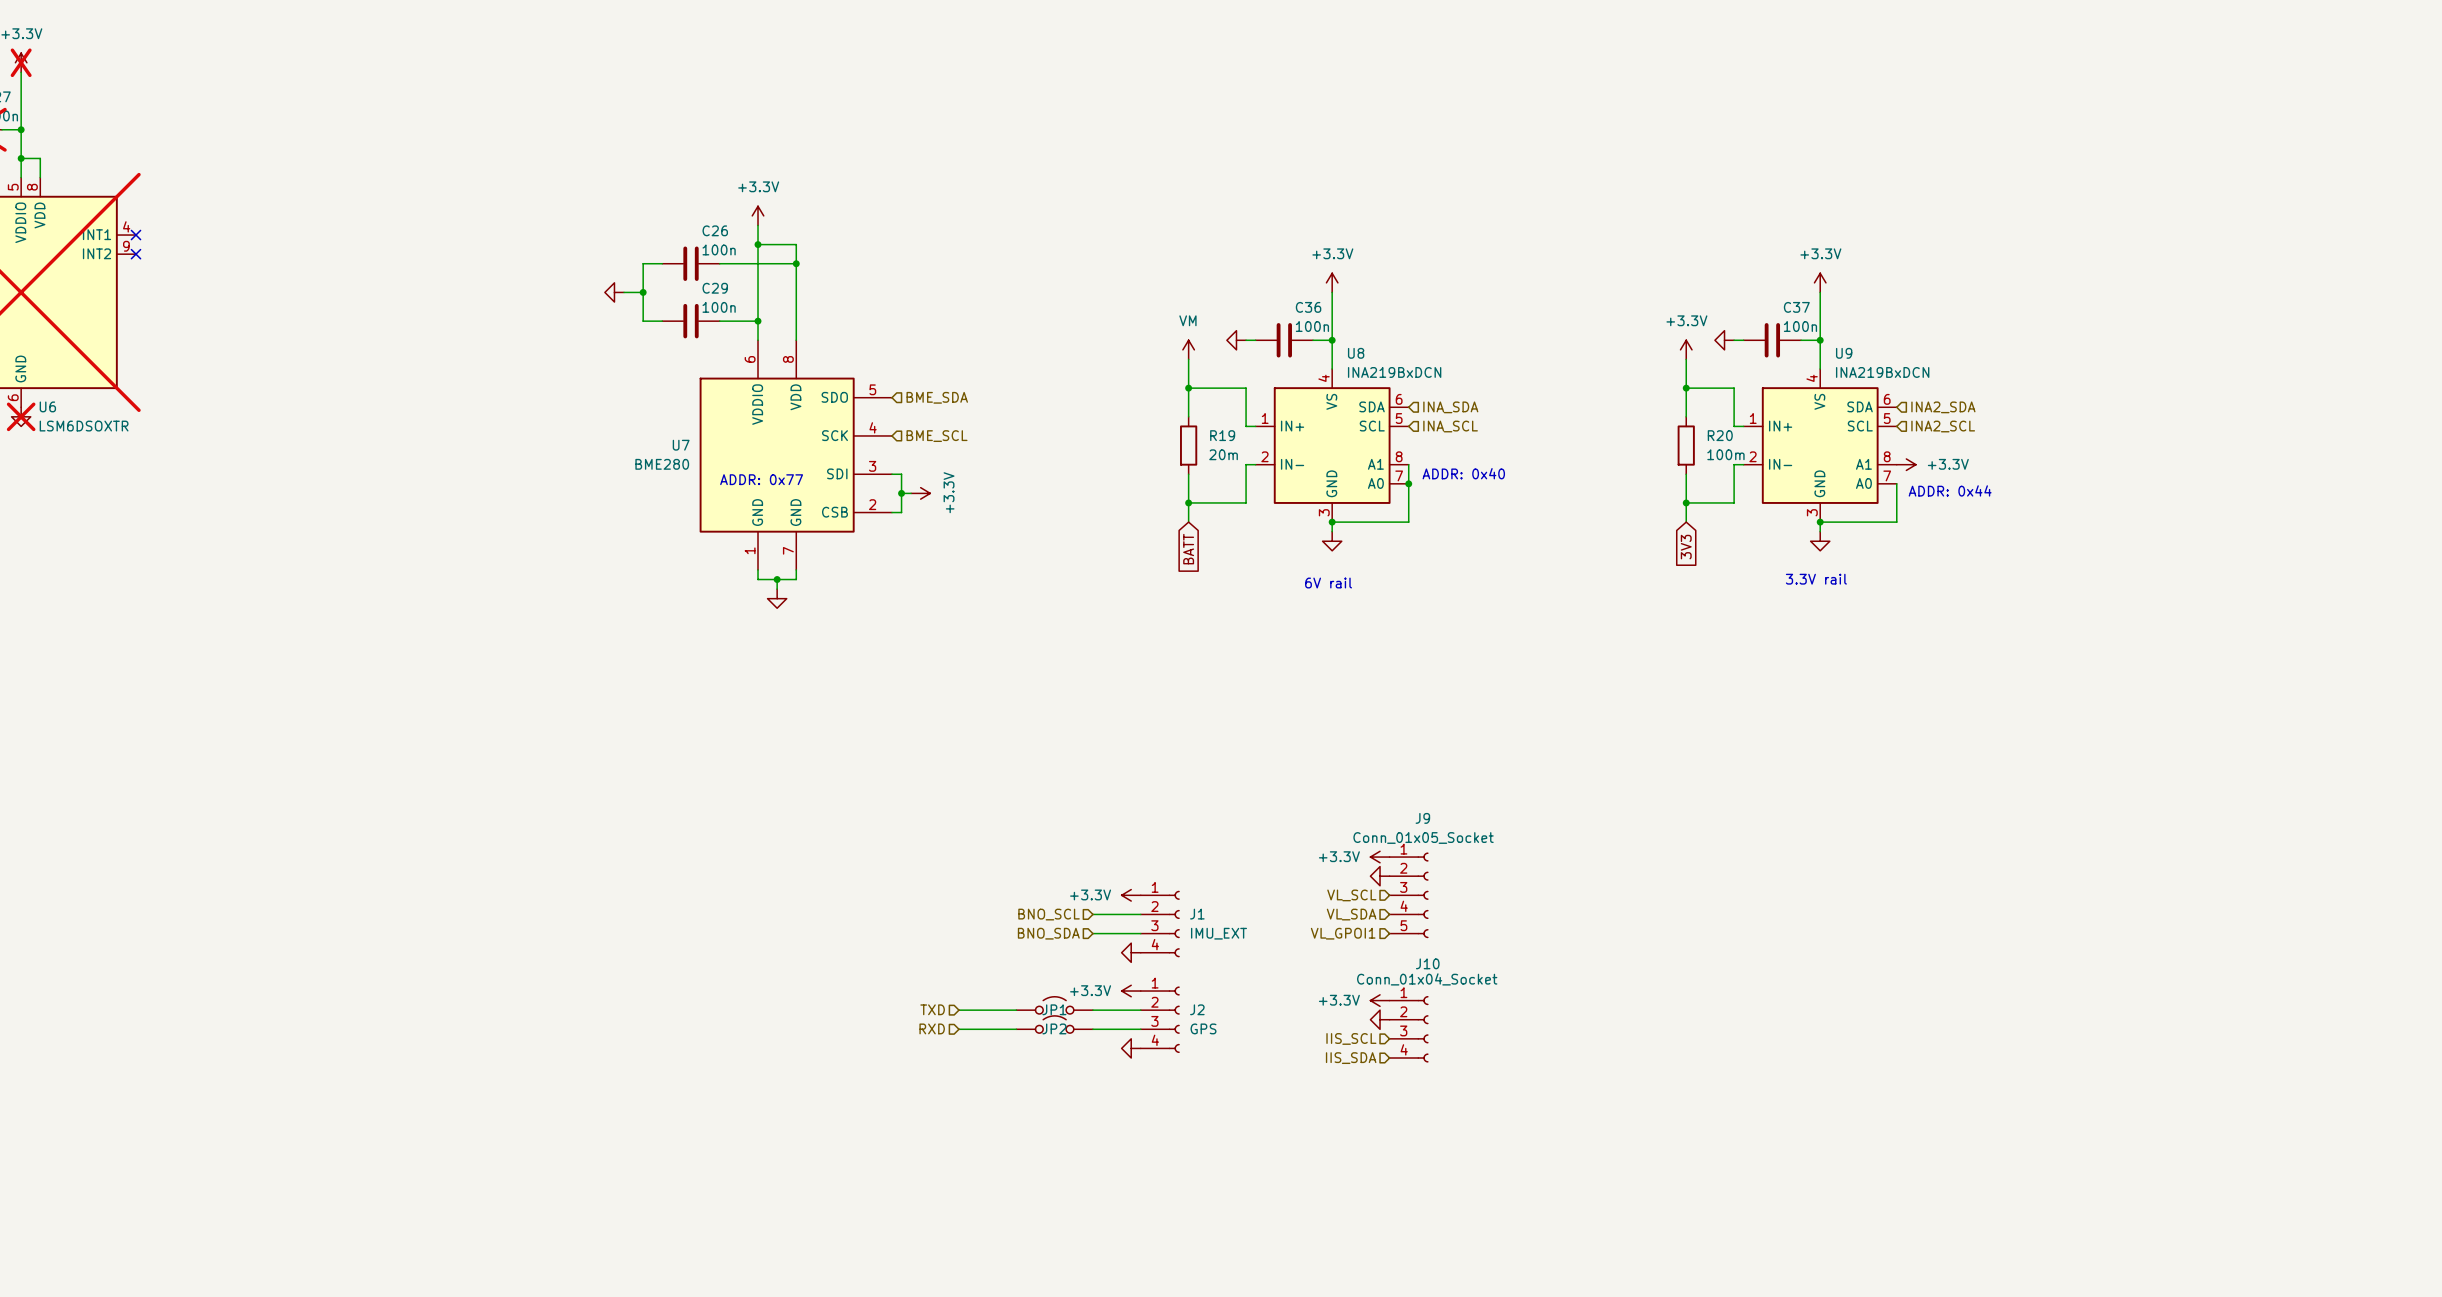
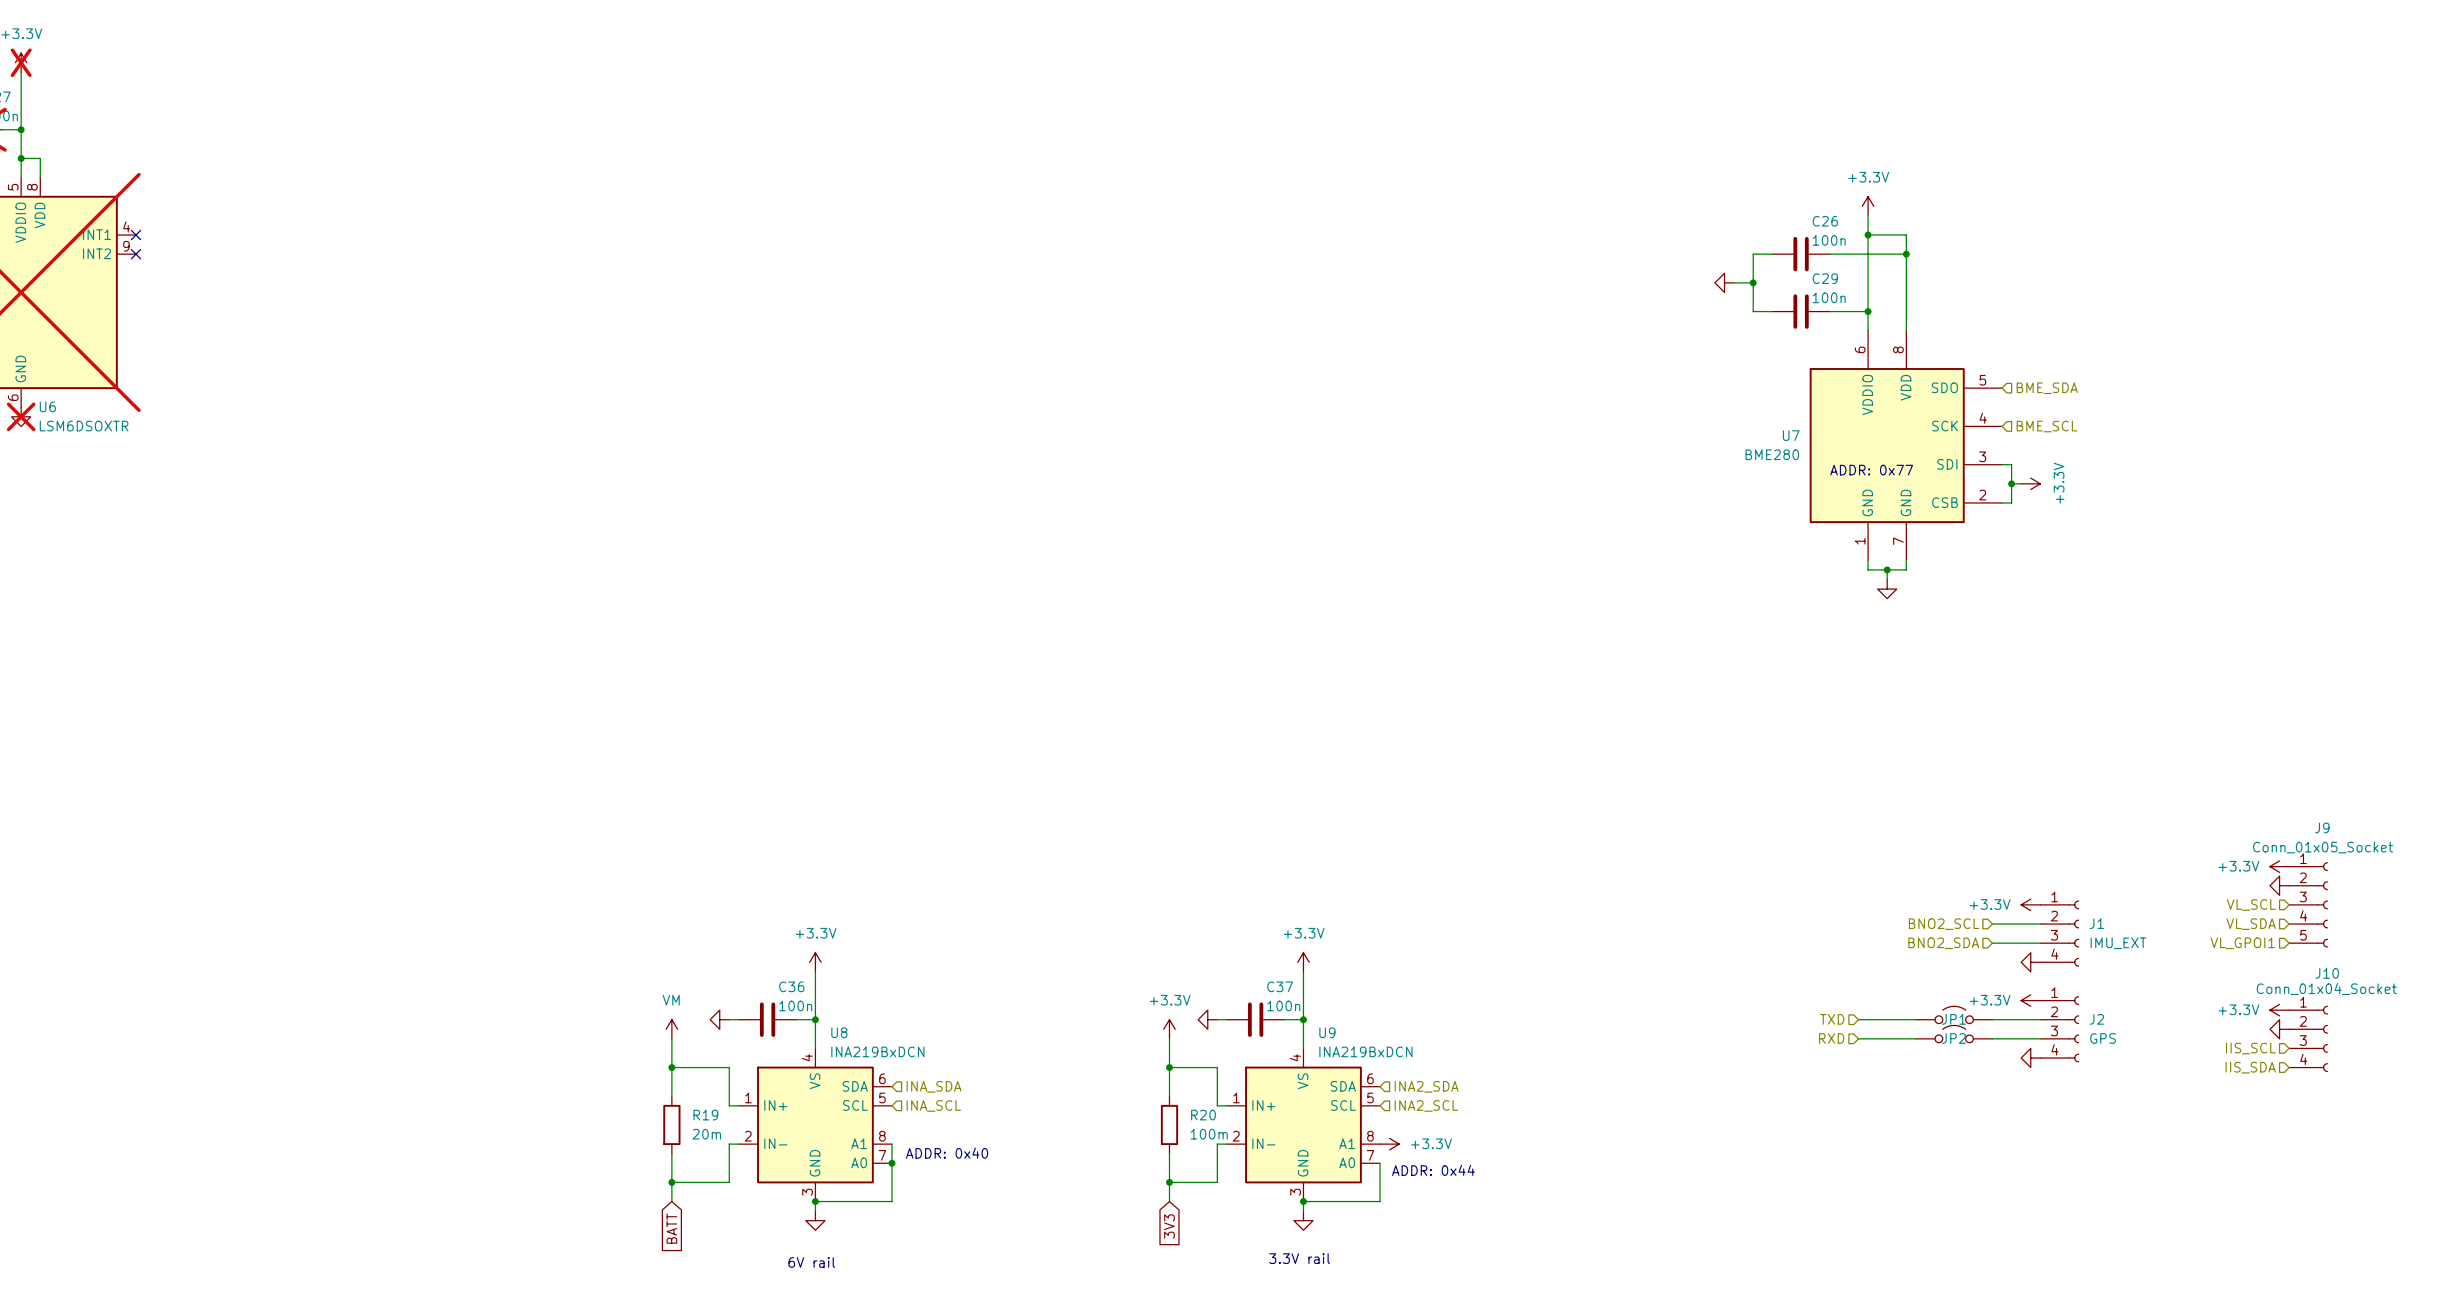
power symbol: +3.3V (758, 215) -> none
wire: none -> (1868, 215) (1868, 330)
wire: (758, 225) (758, 340) -> none
wire: none -> (1868, 235) (1906, 235) (1906, 330)
junction: none -> (1868, 235)
wire: (758, 244) (796, 244) (796, 340) -> none
junction: (758, 244) -> none
wire: none -> (1772, 254) (1753, 254) (1753, 311) (1772, 311)
wire: none -> (1829, 254) (1906, 254)
junction: none -> (1906, 254)
wire: (662, 263) (643, 263) (643, 321) (662, 321) -> none
C26 position: (691, 263) -> (1801, 254)
wire: (719, 263) (796, 263) -> none
junction: (796, 263) -> none
power symbol: +3.3V (1332, 282) -> none
junction: none -> (1753, 282)
power symbol position: +3.3V (1820, 282) -> +3.3V (1868, 206)
power symbol: (614, 292) -> none
wire: (624, 292) (643, 292) -> none
junction: (643, 292) -> none
wire: (1332, 292) (1332, 368) -> none
wire: (1820, 292) (1820, 368) -> none
wire: none -> (1829, 311) (1868, 311)
junction: none -> (1868, 311)
C29 position: (691, 321) -> (1801, 311)
wire: (719, 321) (758, 321) -> none
junction: (758, 321) -> none
power symbol: (1236, 340) -> none
wire: (1246, 340) (1255, 340) -> none
C36 position: (1284, 340) -> (767, 1019)
wire: (1313, 340) (1332, 340) -> none
junction: (1332, 340) -> none
power symbol position: (1724, 340) -> (1724, 282)
wire: (1734, 340) (1743, 340) -> none
C37 position: (1772, 340) -> (1255, 1019)
wire: (1801, 340) (1820, 340) -> (1734, 282) (1753, 282)
junction: (1820, 340) -> none
power symbol: VM (1188, 349) -> none
power symbol: +3.3V (1686, 349) -> none
wire: (1188, 359) (1188, 416) -> none
wire: (1686, 359) (1686, 416) -> none
wire: (1188, 388) (1246, 388) (1246, 426) (1255, 426) -> none
junction: (1188, 388) -> none
wire: (1686, 388) (1734, 388) (1734, 426) (1743, 426) -> none
junction: (1686, 388) -> none
hierarchical label: none -> BME_SDA (2047, 388)
hierarchical label: BME_SDA (937, 397) -> none
hierarchical label: INA_SDA (1450, 407) -> none
hierarchical label: INA2_SDA (1943, 407) -> none
hierarchical label: INA_SCL (1450, 426) -> none
hierarchical label: INA2_SCL (1943, 426) -> none
hierarchical label: none -> BME_SCL (2047, 426)
hierarchical label: BME_SCL (937, 436) -> none
R19 position: (1188, 445) -> (671, 1124)
U8 position: (1332, 445) -> (815, 1124)
R20 position: (1686, 445) -> (1169, 1124)
U9 position: (1820, 445) -> (1303, 1124)
U7 position: (795, 455) -> (1905, 445)
wire: (1255, 464) (1246, 464) (1246, 502) (1188, 502) -> none
wire: (1408, 464) (1408, 522) (1332, 522) (1332, 531) -> none
wire: (1743, 464) (1734, 464) (1734, 502) (1686, 502) -> none
power symbol position: +3.3V (1906, 464) -> +3.3V (2030, 483)
power symbol text rotation: 0° (1948, 464) -> 90° counterclockwise (2059, 483)
wire: none -> (2002, 464) (2011, 464) (2011, 502) (2002, 502)
text: none -> ADDR: 0x77 (1871, 470)
text: ADDR: 0x40 (1463, 473) -> none
wire: (891, 474) (901, 474) (901, 512) (891, 512) -> none
wire: (1188, 474) (1188, 522) -> none
wire: (1686, 474) (1686, 522) -> none
text: ADDR: 0x77 (761, 479) -> none
junction: (1408, 483) -> none
wire: none -> (2011, 483) (2021, 483)
junction: none -> (2011, 483)
text: ADDR: 0x44 (1950, 490) -> none
wire: (901, 493) (911, 493) -> none
junction: (901, 493) -> none
power symbol: +3.3V (920, 493) -> none
junction: (1188, 502) -> none
junction: (1686, 502) -> none
junction: (1332, 522) -> none
junction: (1820, 522) -> none
power symbol: (1332, 541) -> none
power symbol position: (1820, 541) -> (1887, 589)
global label: 3V3 (1686, 547) -> none
global label: BATT (1188, 549) -> none
wire: none -> (1868, 560) (1868, 569) (1906, 569) (1906, 560)
wire: (758, 569) (758, 579) (796, 579) (796, 569) -> none
wire: none -> (1887, 569) (1887, 579)
junction: none -> (1887, 569)
wire: (777, 579) (777, 589) -> none
junction: (777, 579) -> none
text: 3.3V rail (1816, 579) -> none
text: 6V rail (1328, 583) -> none
power symbol: (777, 598) -> none
power symbol: +3.3V (1380, 857) -> none
power symbol: none -> +3.3V (2279, 866)
power symbol: (1380, 876) -> none
power symbol: none -> (2279, 885)
power symbol: +3.3V (1131, 895) -> none
hierarchical label: VL_SCL (1351, 895) -> none
J9 position: (1409, 895) -> (2308, 904)
power symbol: none -> +3.3V (2030, 904)
hierarchical label: none -> VL_SCL (2251, 904)
hierarchical label: BNO_SCL (1049, 914) -> none
wire: (1092, 914) (1140, 914) -> none
hierarchical label: VL_SDA (1351, 914) -> none
J1 position: (1160, 924) -> (2059, 933)
hierarchical label: none -> BNO2_SCL (1944, 924)
wire: none -> (1992, 924) (2040, 924)
hierarchical label: none -> VL_SDA (2251, 924)
hierarchical label: BNO_SDA (1048, 933) -> none
wire: (1092, 933) (1140, 933) -> none
hierarchical label: VL_GPOI1 (1343, 933) -> none
hierarchical label: none -> BNO2_SDA (1943, 943)
wire: none -> (1992, 943) (2040, 943)
hierarchical label: none -> VL_GPOI1 (2242, 943)
power symbol: (1131, 952) -> none
power symbol: none -> +3.3V (815, 962)
power symbol: none -> +3.3V (1303, 962)
power symbol: none -> (2030, 962)
wire: none -> (815, 971) (815, 1048)
wire: none -> (1303, 971) (1303, 1048)
power symbol text position: +3.3V (1090, 990) -> +3.3V (1170, 1000)
power symbol rotation: 0° (1131, 991) -> 90° clockwise (1169, 1029)
power symbol position: +3.3V (1131, 991) -> +3.3V (1169, 1029)
power symbol: +3.3V (1380, 1000) -> none
power symbol: none -> +3.3V (2030, 1000)
JP1 position: (1054, 1005) -> (1954, 1014)
hierarchical label: TXD (932, 1009) -> none
wire: (958, 1010) (1016, 1010) -> none
wire: (1092, 1010) (1140, 1010) -> none
power symbol: none -> +3.3V (2279, 1010)
power symbol: none -> (719, 1019)
wire: none -> (729, 1019) (738, 1019)
wire: none -> (796, 1019) (815, 1019)
junction: none -> (815, 1019)
J2 position: (1160, 1019) -> (2059, 1029)
power symbol: none -> (1207, 1019)
wire: none -> (1217, 1019) (1226, 1019)
wire: none -> (1284, 1019) (1303, 1019)
junction: none -> (1303, 1019)
power symbol: (1380, 1019) -> none
hierarchical label: none -> TXD (1832, 1019)
wire: none -> (1858, 1019) (1915, 1019)
wire: none -> (1992, 1019) (2040, 1019)
JP2 position: (1054, 1024) -> (1954, 1034)
hierarchical label: RXD (932, 1028) -> none
power symbol: none -> VM (671, 1029)
wire: (958, 1029) (1016, 1029) -> none
wire: (1092, 1029) (1140, 1029) -> none
J10 position: (1409, 1029) -> (2308, 1038)
power symbol: none -> (2279, 1029)
wire: none -> (671, 1038) (671, 1096)
wire: none -> (1169, 1038) (1169, 1096)
hierarchical label: IIS_SCL (1351, 1038) -> none
hierarchical label: none -> RXD (1831, 1038)
wire: none -> (1858, 1038) (1915, 1038)
wire: none -> (1992, 1038) (2040, 1038)
power symbol: (1131, 1048) -> none
hierarchical label: none -> IIS_SCL (2250, 1048)
hierarchical label: IIS_SDA (1351, 1058) -> none
power symbol: none -> (2030, 1058)
wire: none -> (671, 1067) (729, 1067) (729, 1105) (738, 1105)
junction: none -> (671, 1067)
wire: none -> (1169, 1067) (1217, 1067) (1217, 1105) (1226, 1105)
junction: none -> (1169, 1067)
hierarchical label: none -> IIS_SDA (2250, 1067)
hierarchical label: none -> INA_SDA (934, 1086)
hierarchical label: none -> INA2_SDA (1426, 1086)
hierarchical label: none -> INA_SCL (933, 1105)
hierarchical label: none -> INA2_SCL (1426, 1105)
wire: none -> (738, 1144) (729, 1144) (729, 1182) (671, 1182)
wire: none -> (891, 1144) (891, 1201) (815, 1201) (815, 1211)
wire: none -> (1226, 1144) (1217, 1144) (1217, 1182) (1169, 1182)
power symbol: none -> +3.3V (1389, 1144)
wire: none -> (671, 1153) (671, 1201)
text: none -> ADDR: 0x40 (947, 1153)
wire: none -> (1169, 1153) (1169, 1201)
junction: none -> (891, 1163)
wire: none -> (1380, 1163) (1380, 1201) (1303, 1201) (1303, 1211)
text: none -> ADDR: 0x44 (1433, 1170)
junction: none -> (671, 1182)
junction: none -> (1169, 1182)
junction: none -> (815, 1201)
junction: none -> (1303, 1201)
power symbol: none -> (815, 1220)
power symbol: none -> (1303, 1220)
global label: none -> 3V3 (1169, 1226)
global label: none -> BATT (671, 1228)
text: none -> 3.3V rail (1299, 1258)
text: none -> 6V rail (811, 1262)

